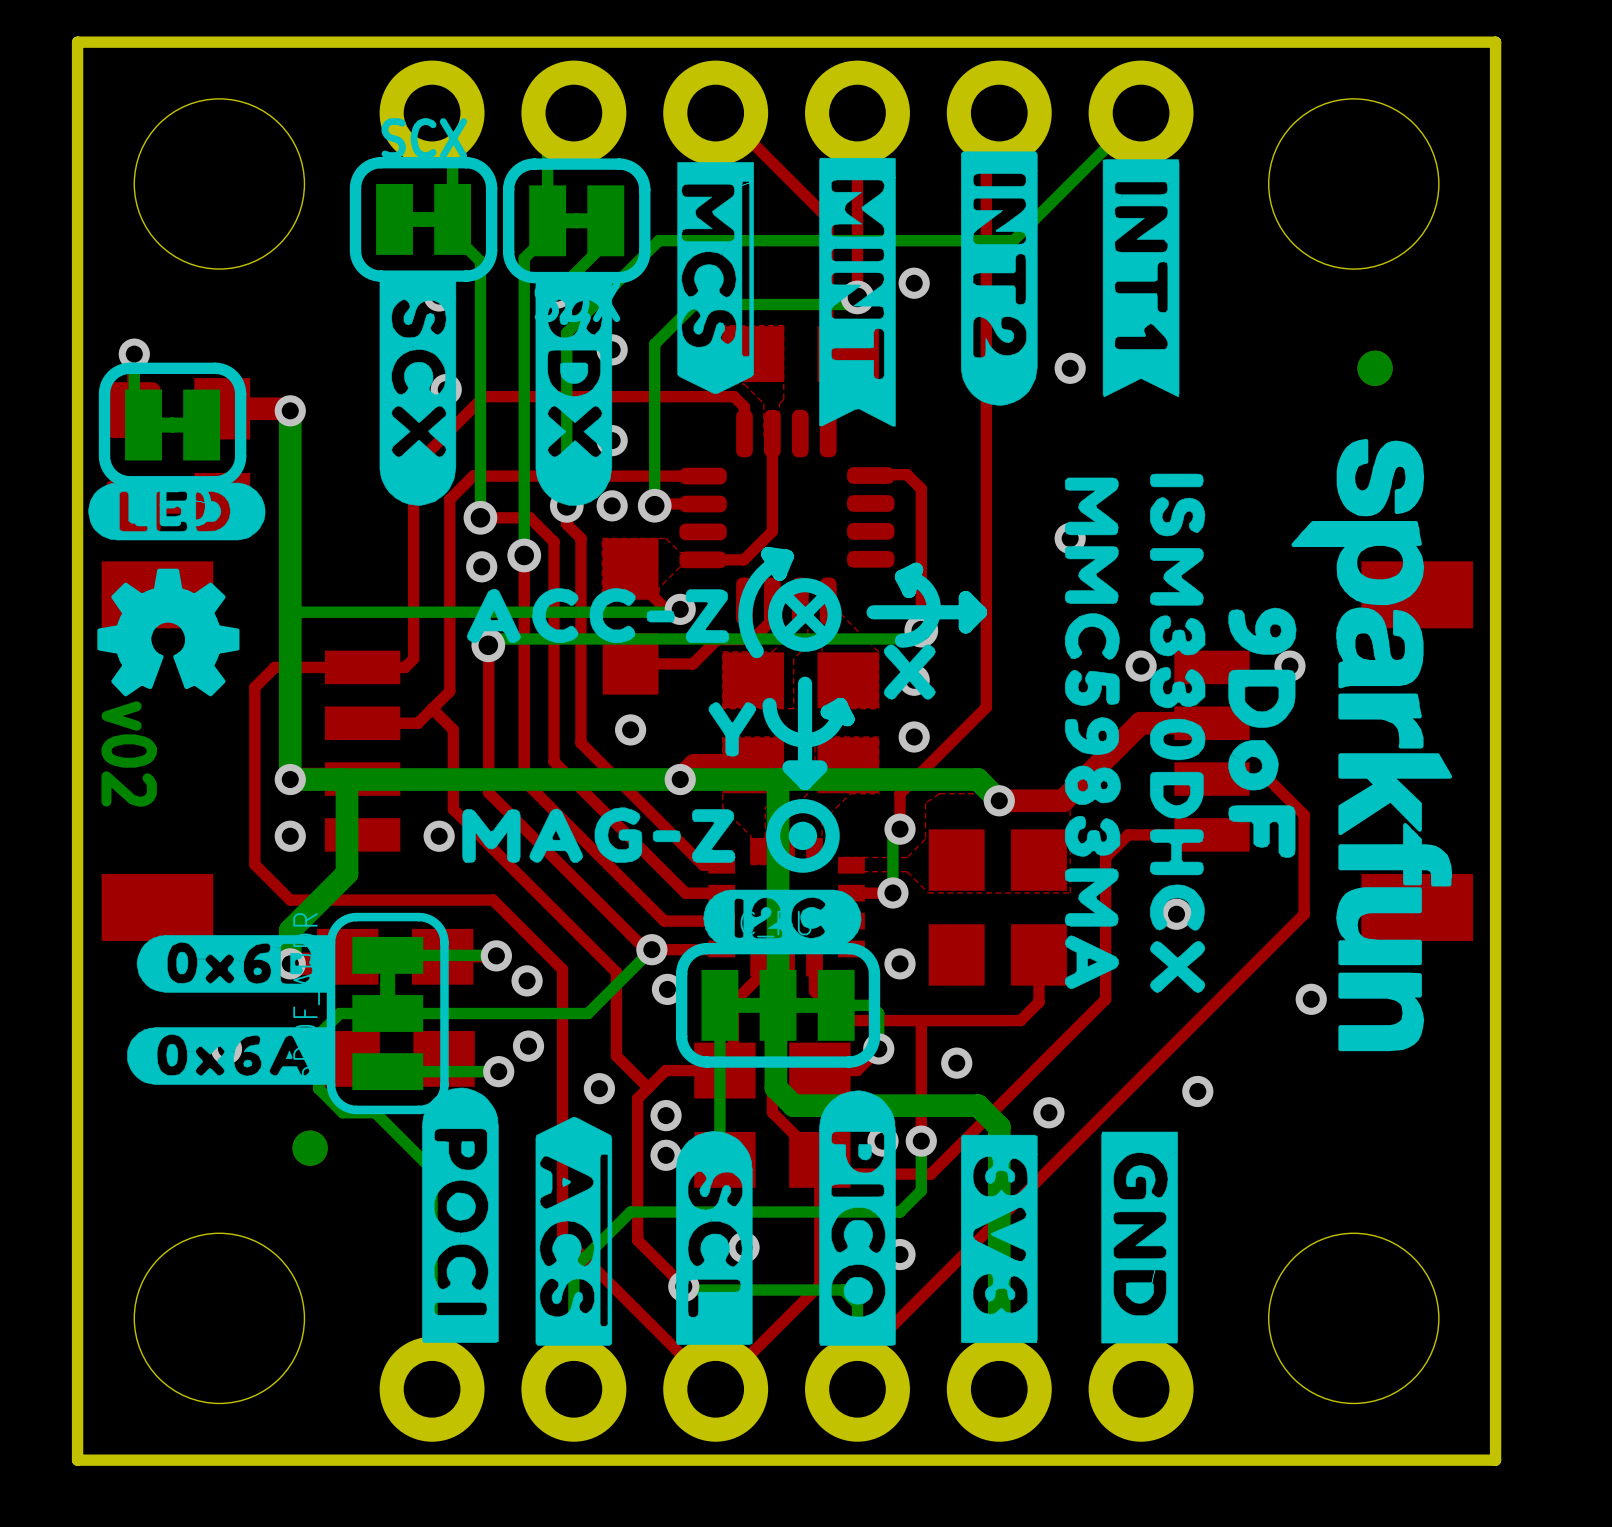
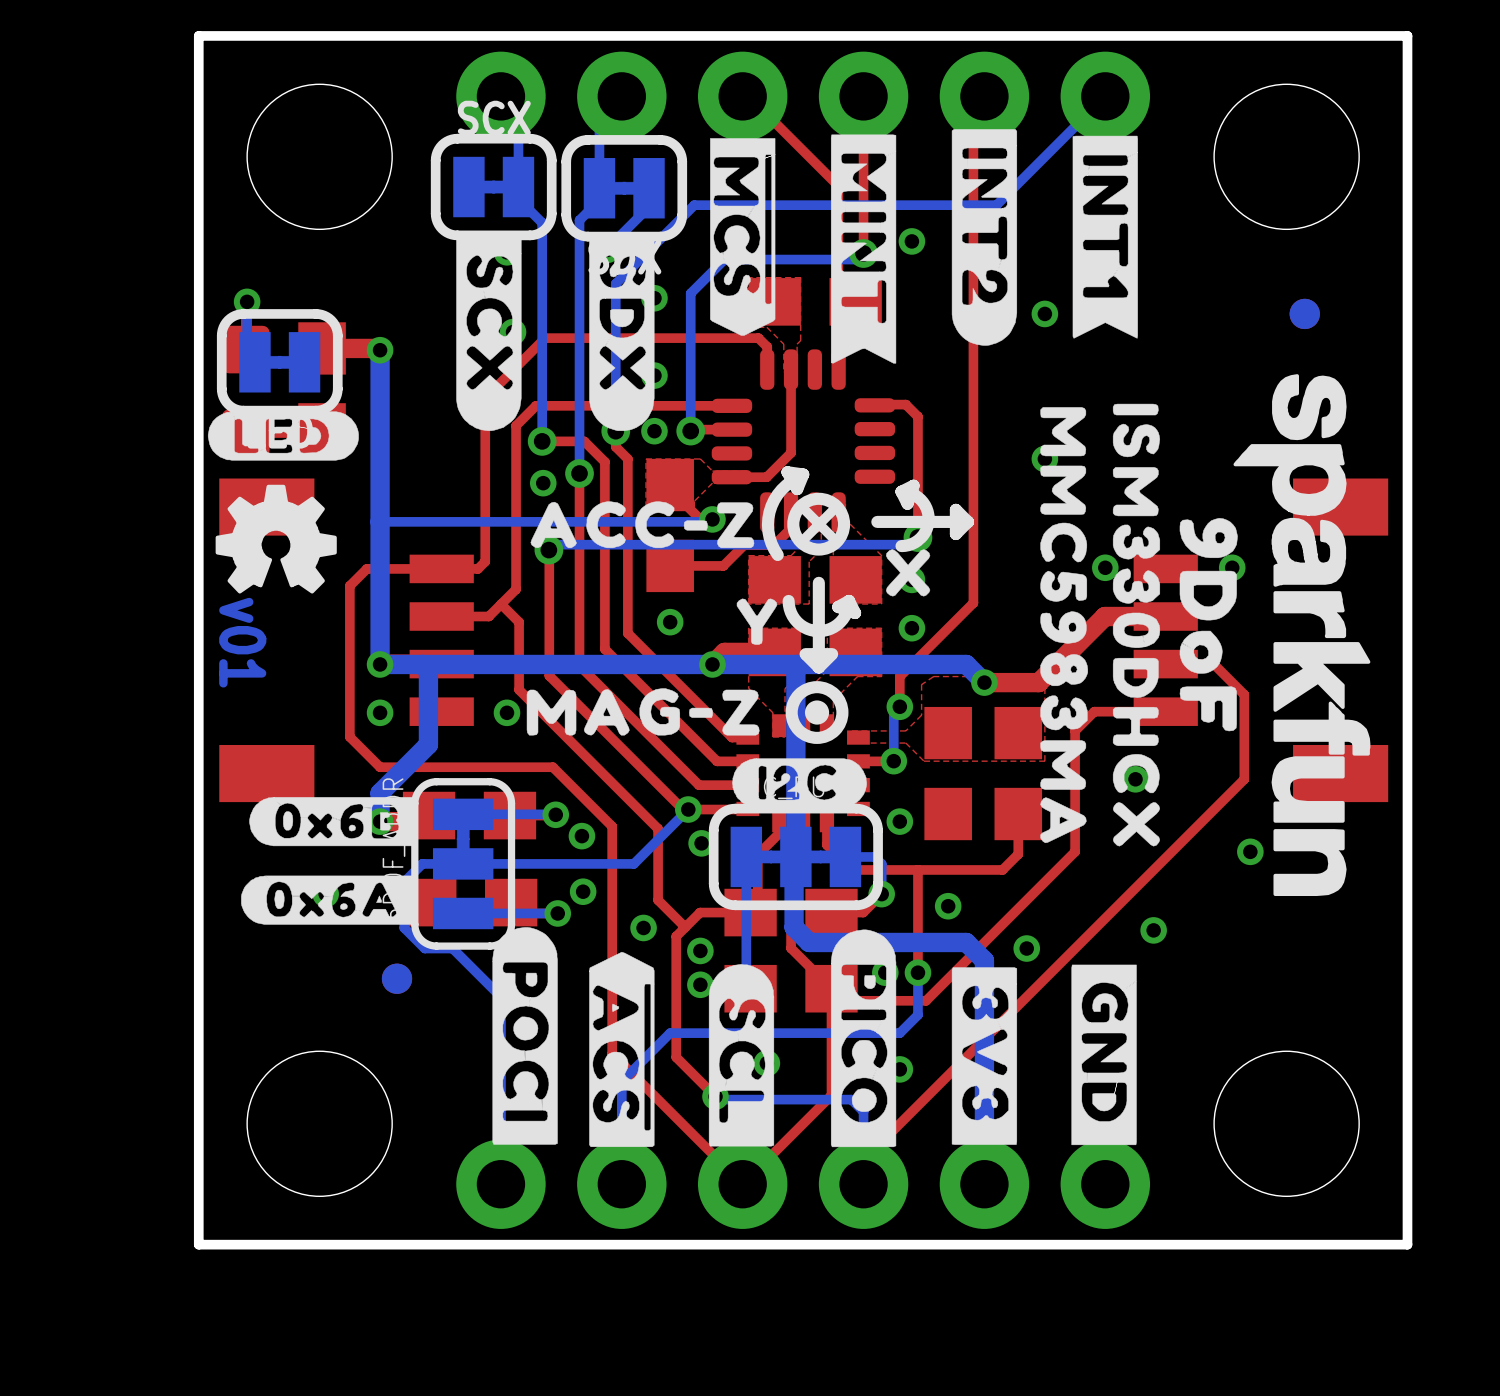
text: v02 (129, 753) -> v01 (242, 642)

